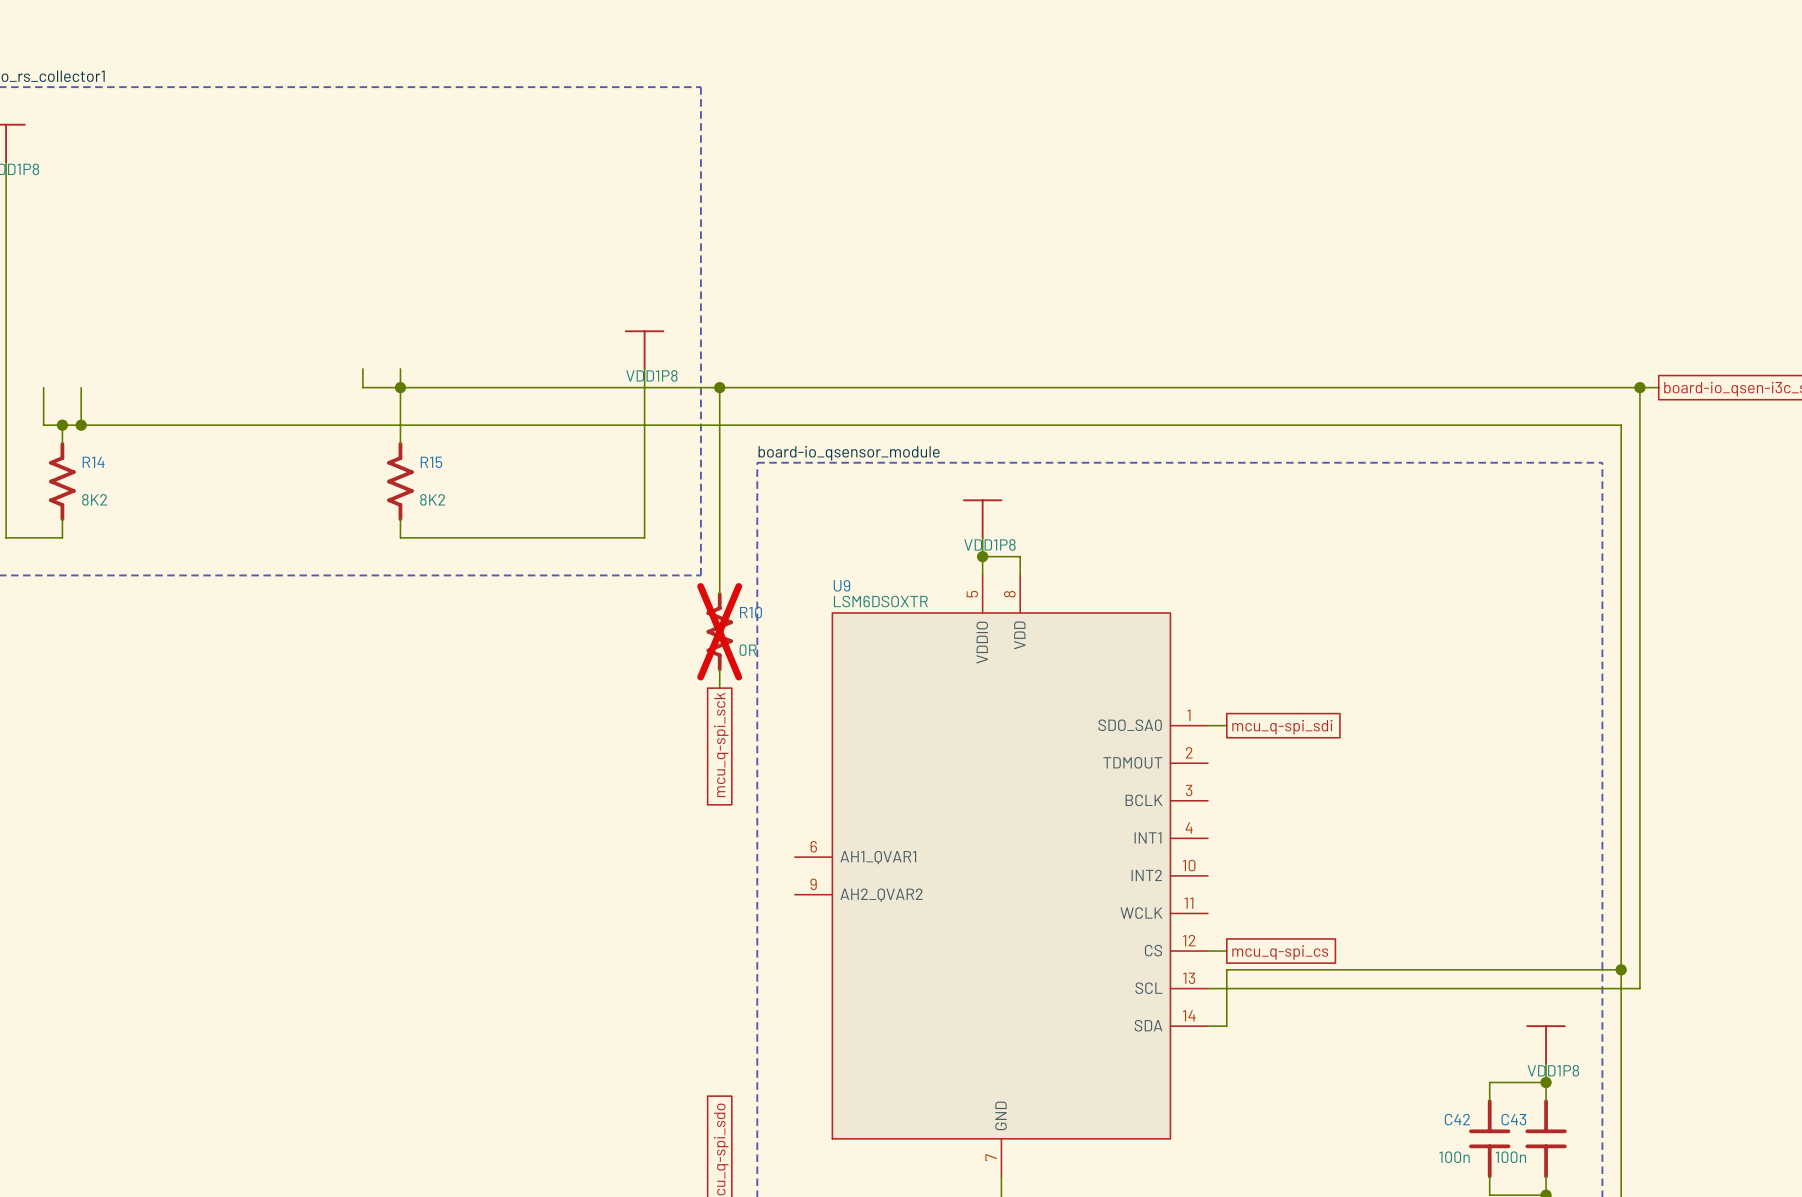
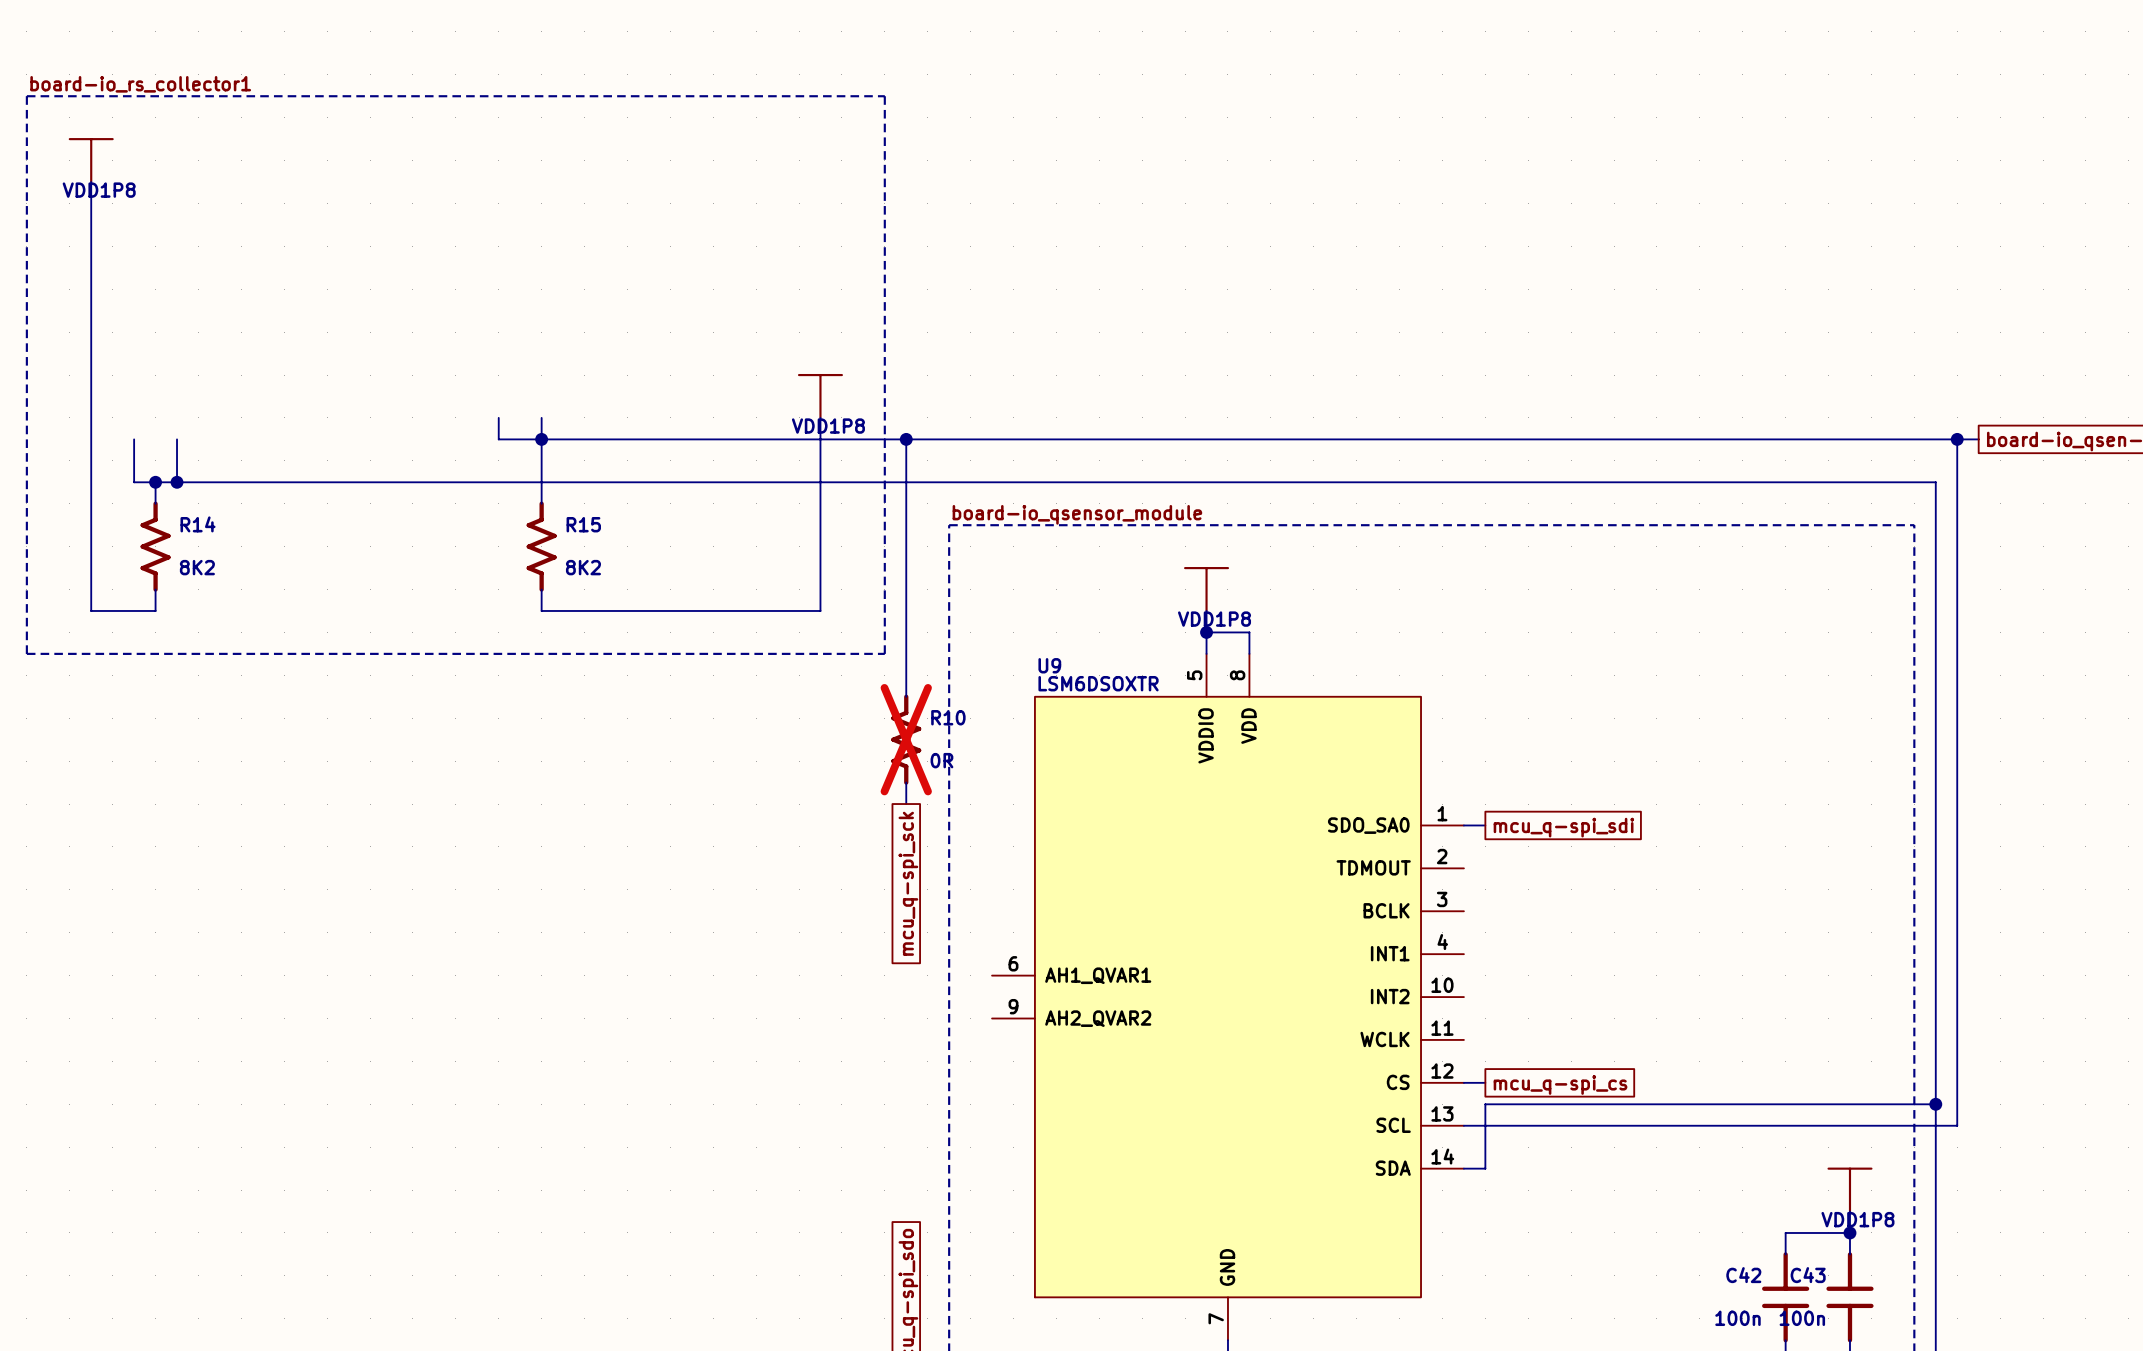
R10 position: (719, 631) -> (906, 739)
global label position: mcu_q-spi_sck (721, 744) -> mcu_q-spi_sck (908, 883)

